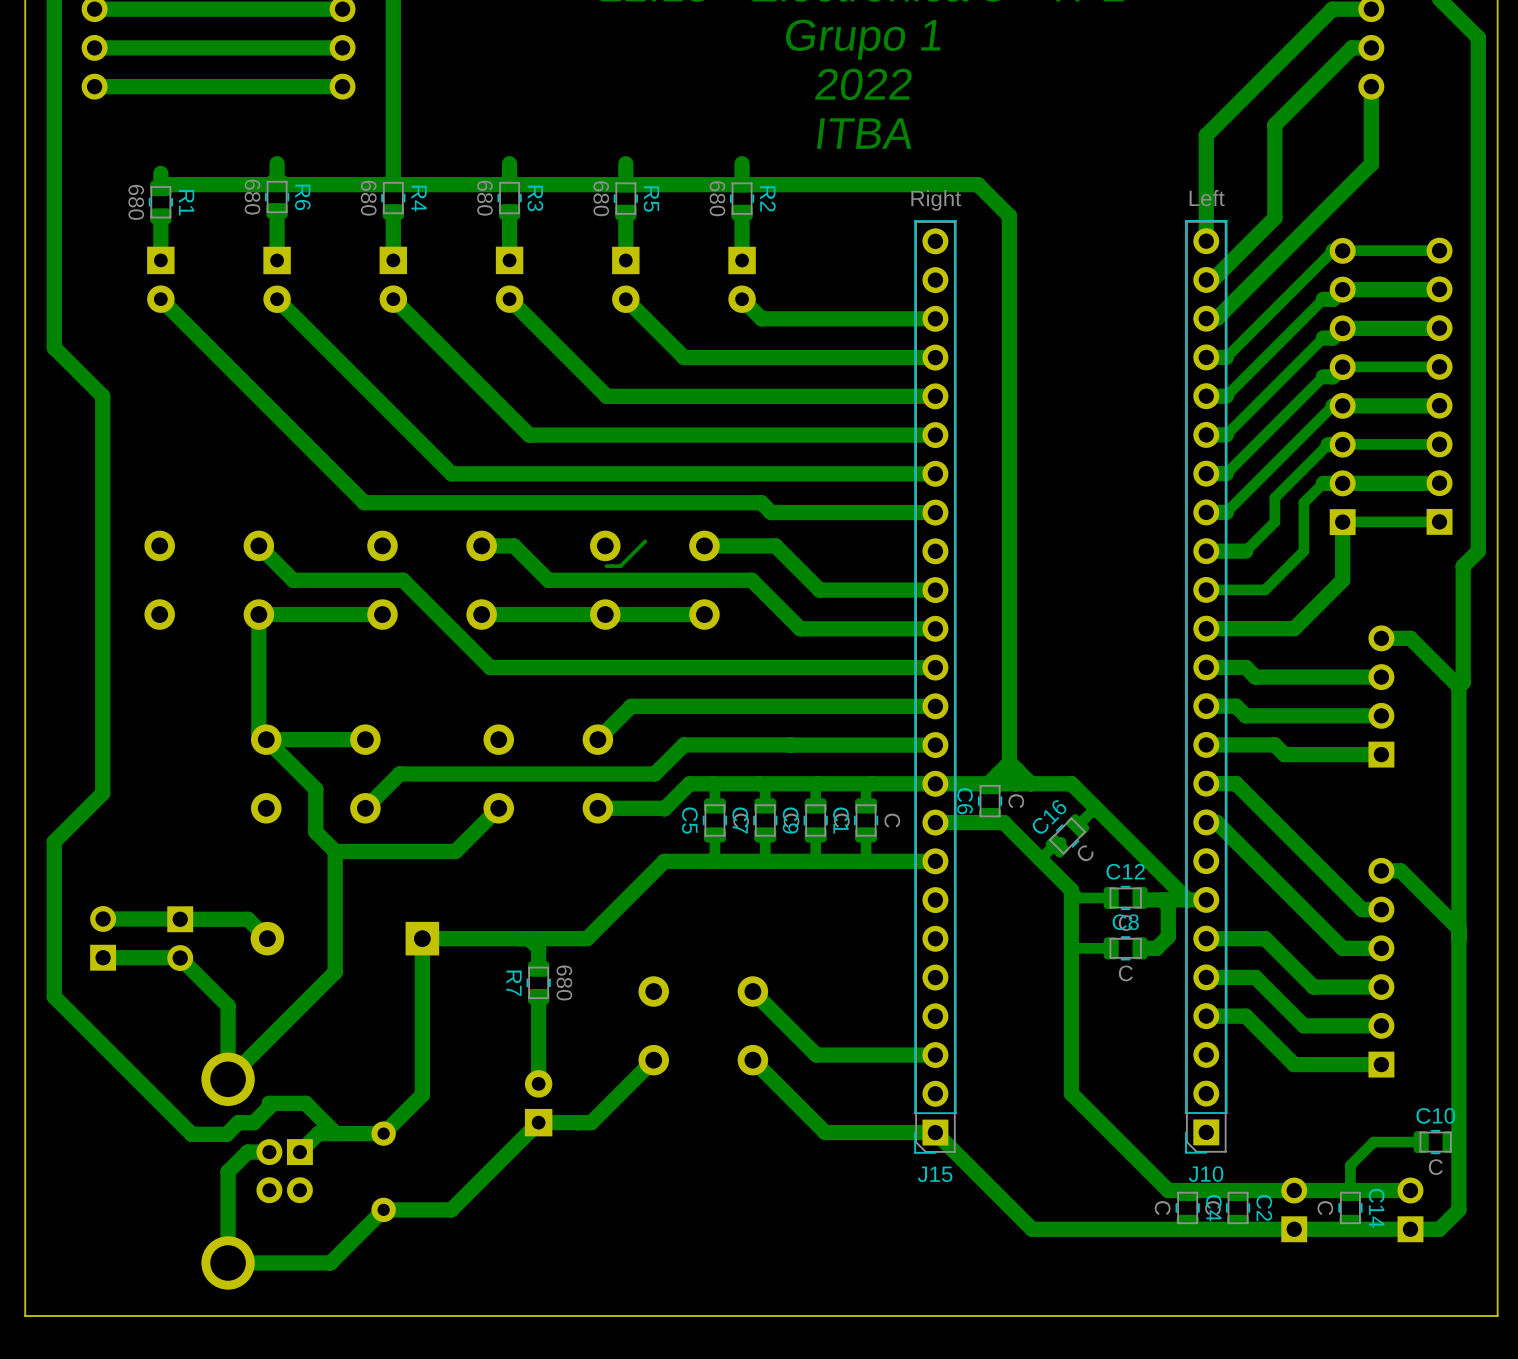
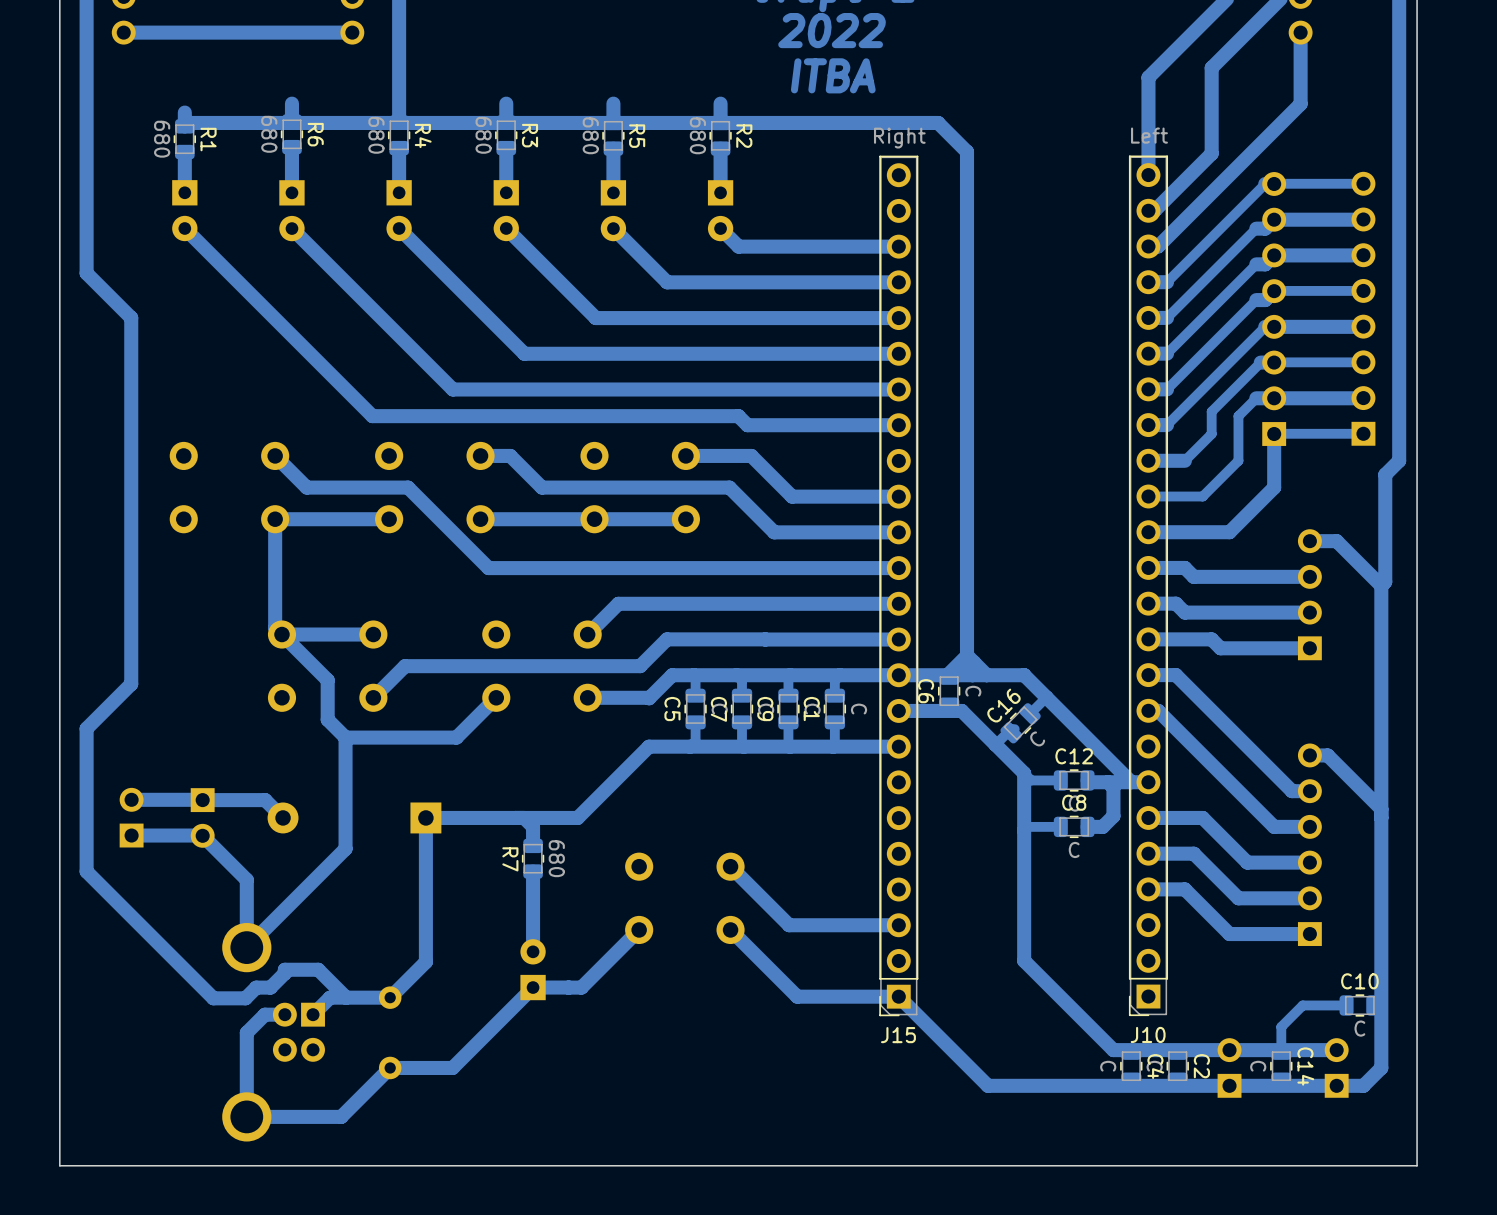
track: (645, 541) (620, 566) (606, 566) -> none

